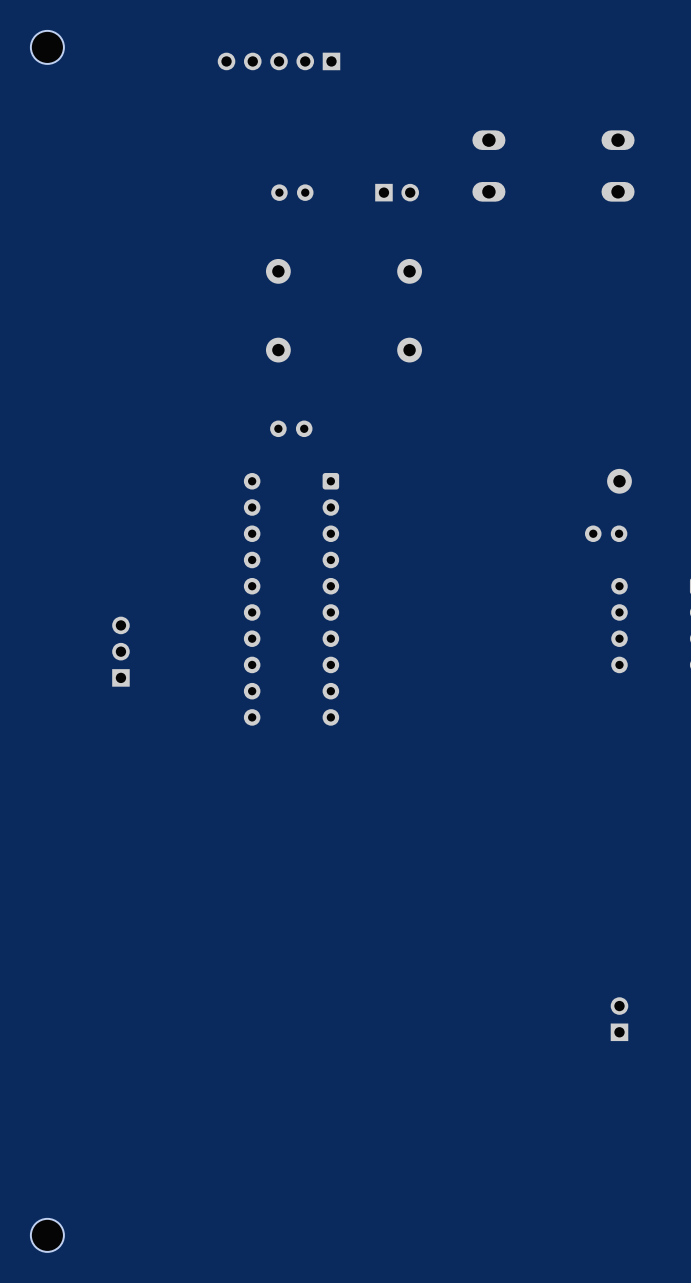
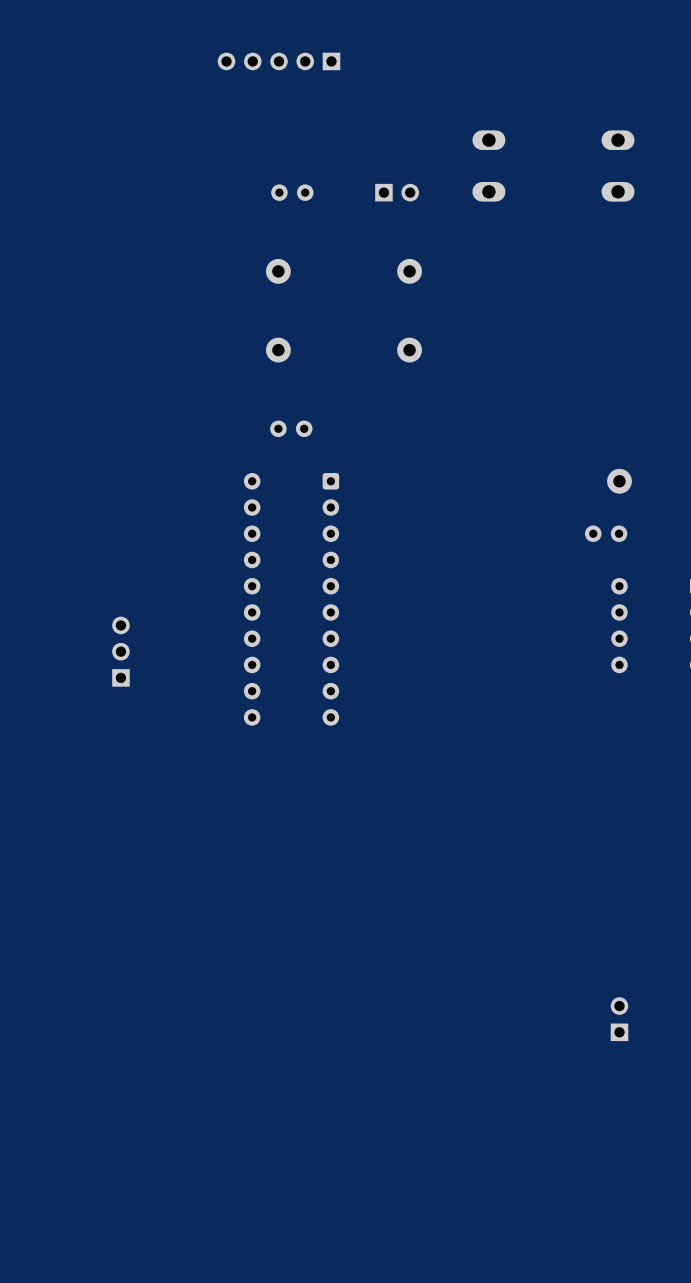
part: (47, 47) -> none
part: (47, 1235) -> none

